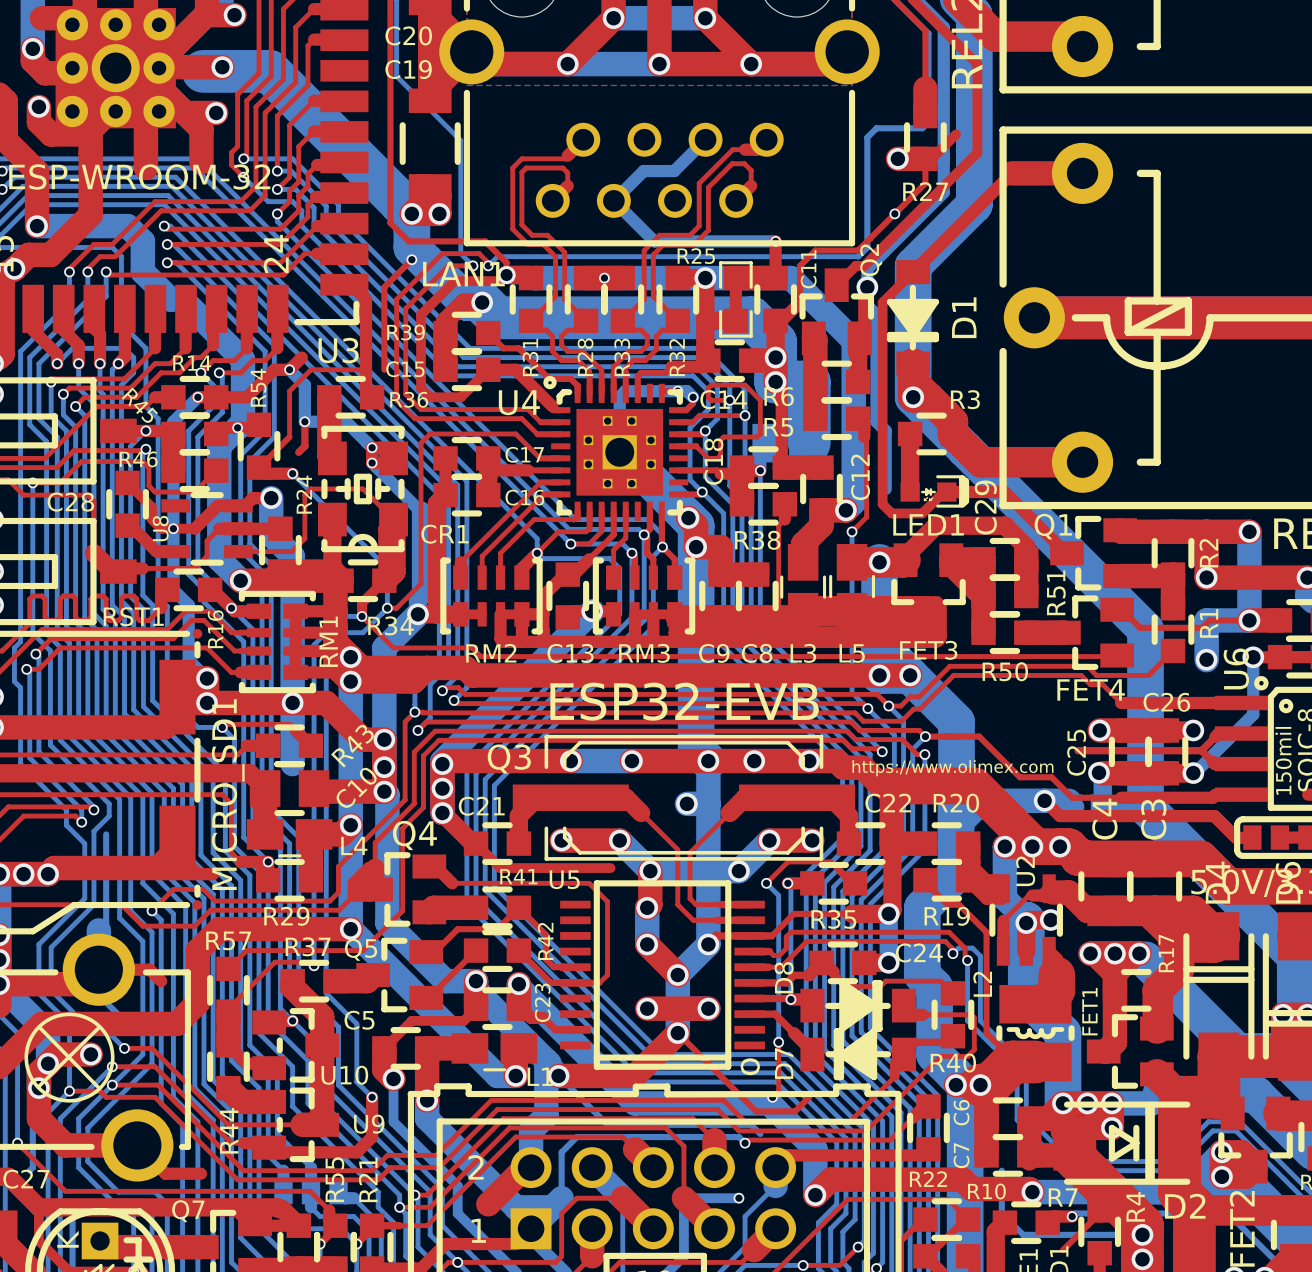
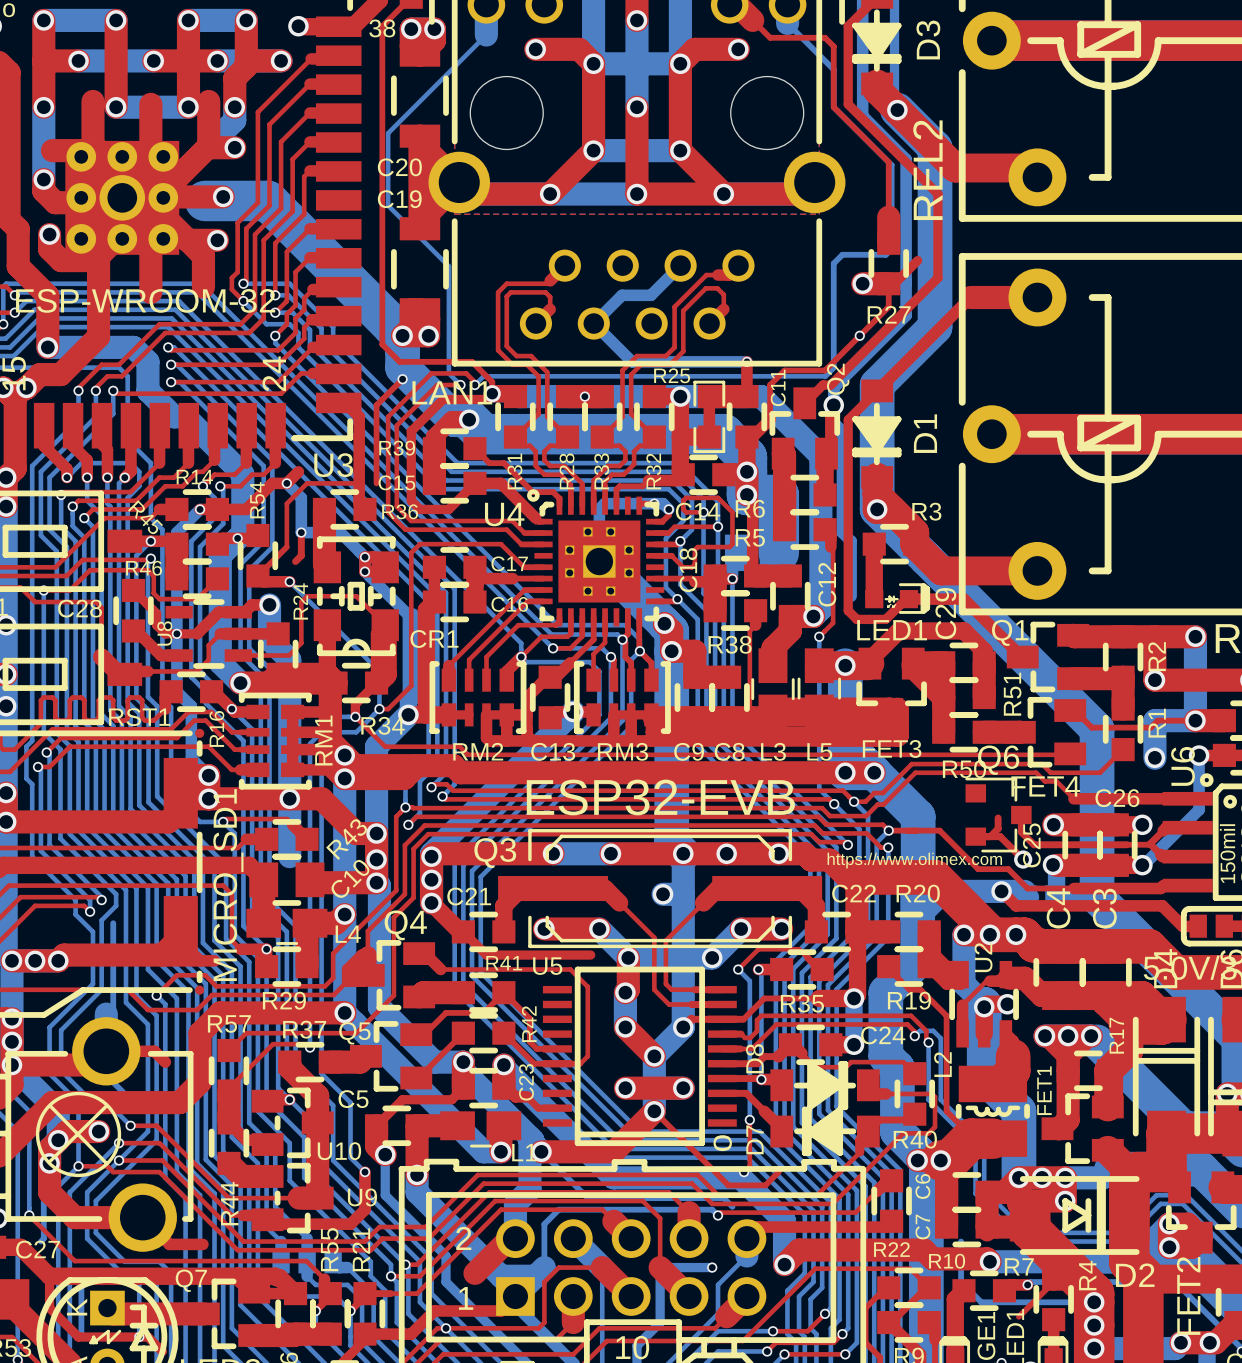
Q6: none -> (998, 815)
top track: none -> (998, 817) (998, 828) (990, 836)
top track: none -> (975, 836) (1000, 836) (1023, 859)
top track: (1078, 750) (1201, 750) -> (1021, 815) (1021, 832) (1034, 844) (1150, 843)
via: none -> (1023, 859)

